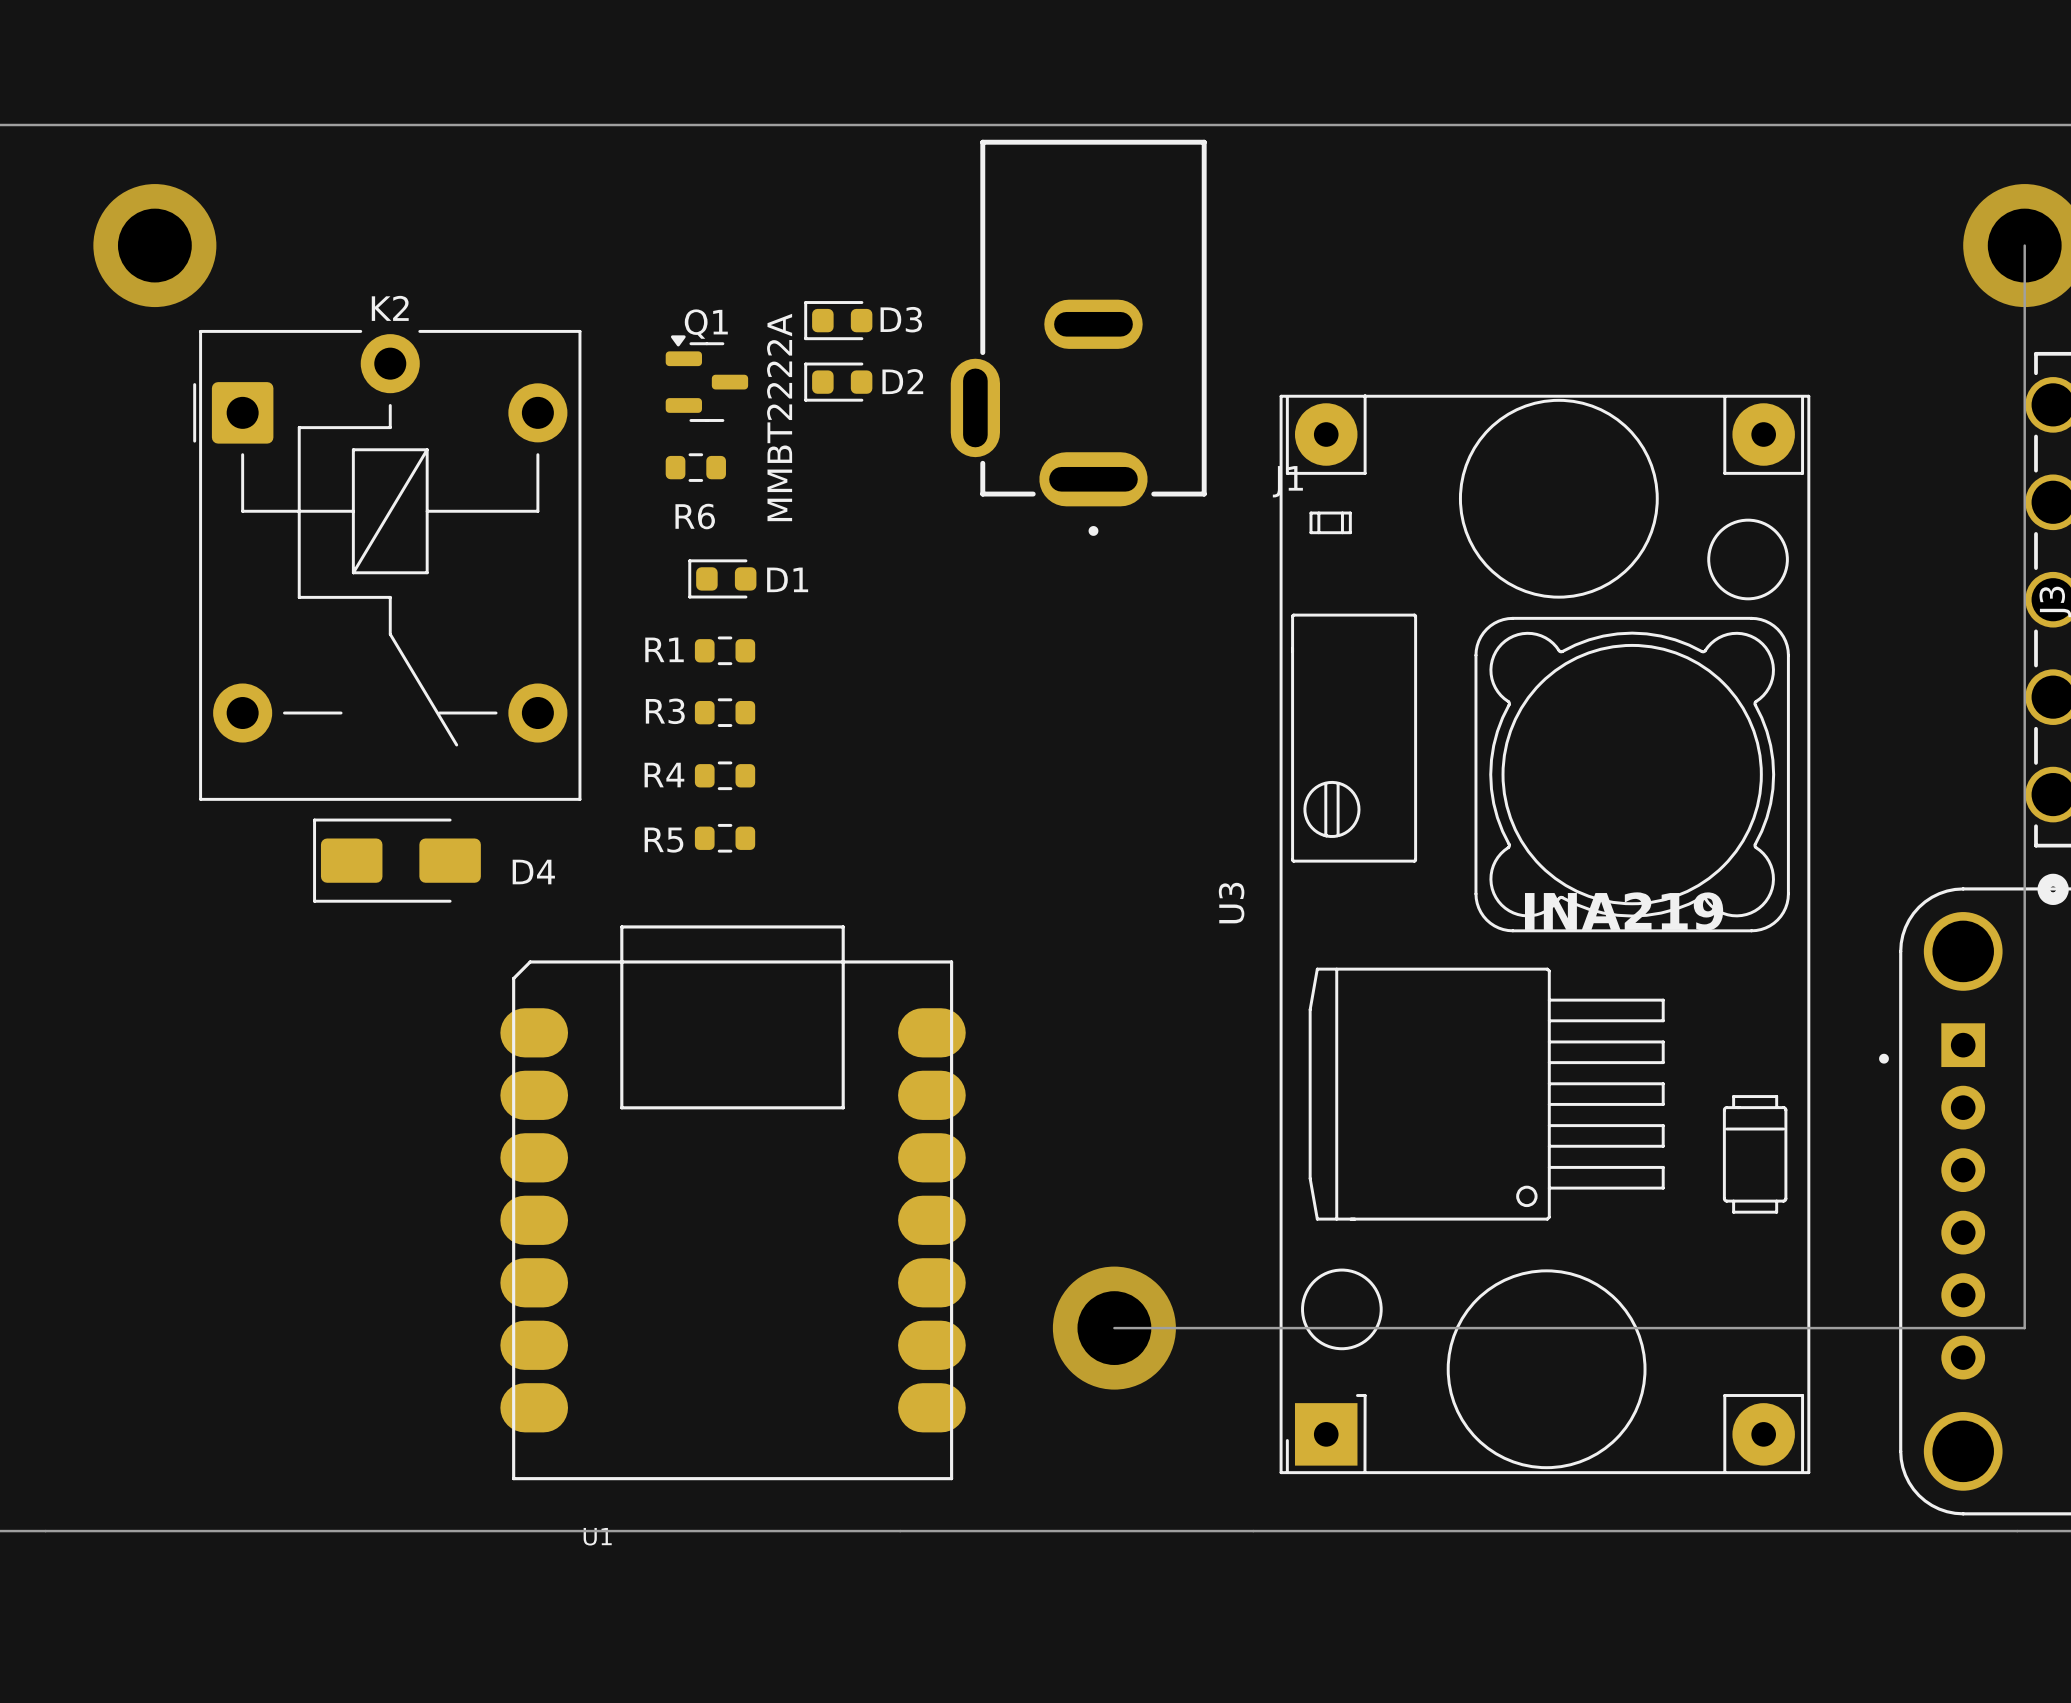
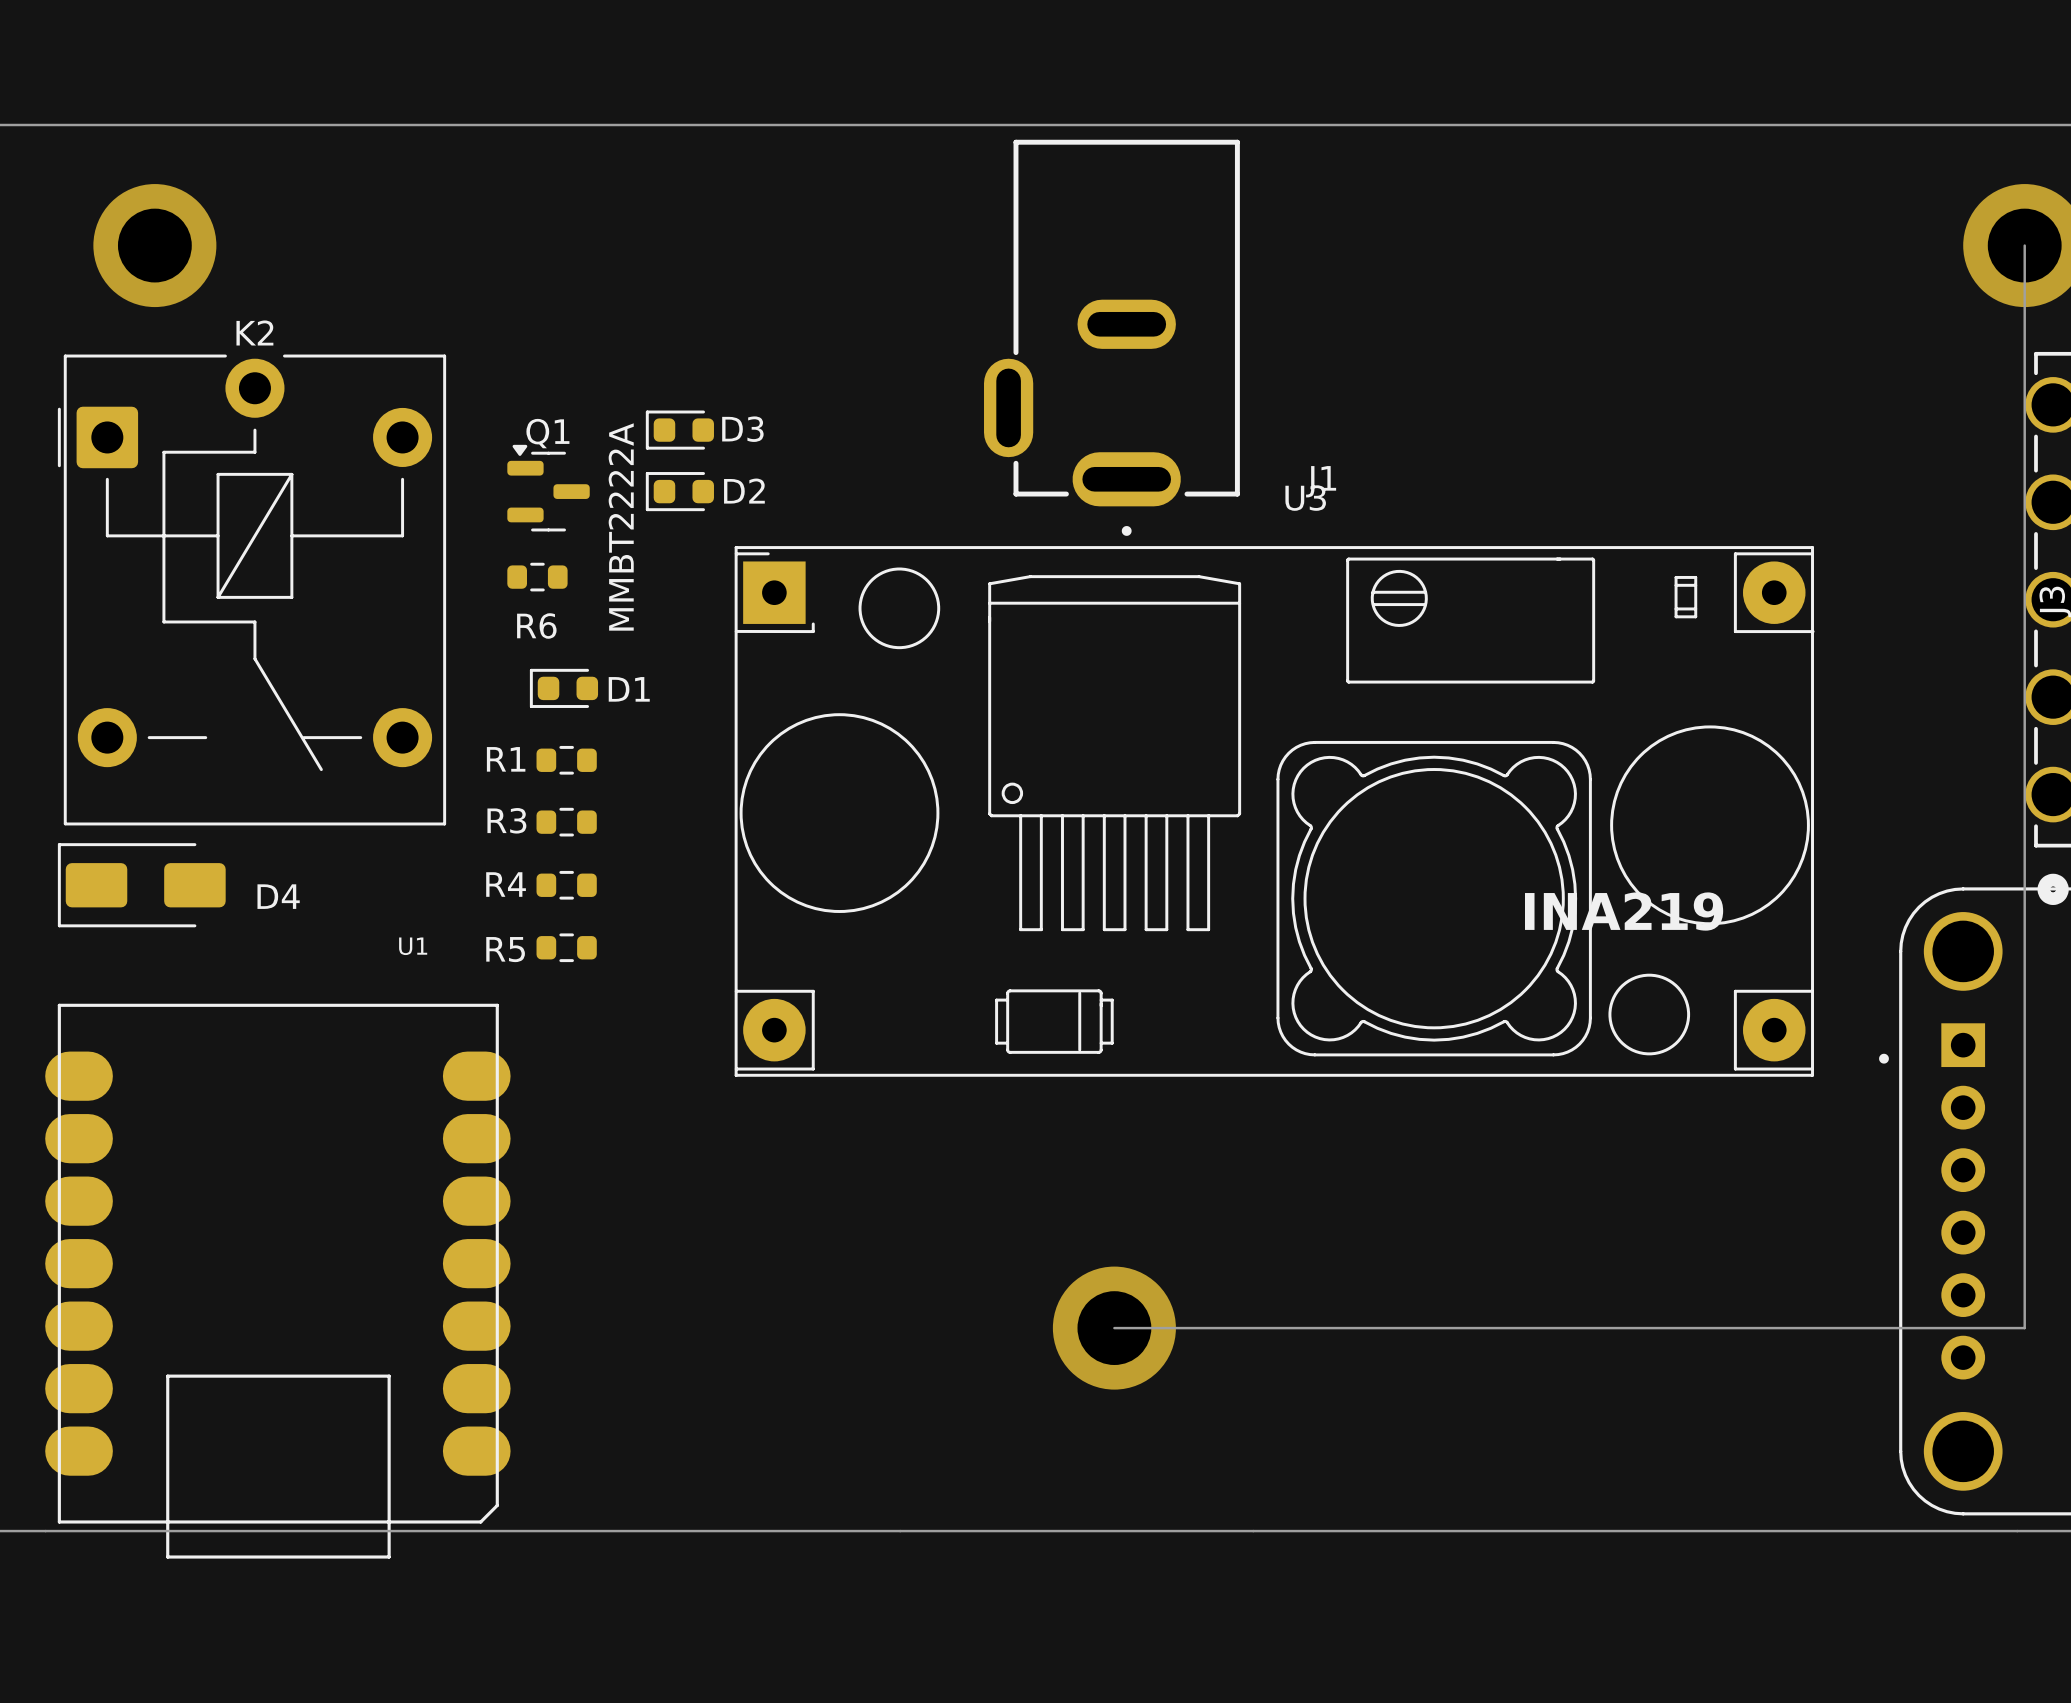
D3 position: (838, 320) -> (679, 430)
J1 position: (1078, 337) -> (1111, 337)
Q1 position: (706, 378) -> (548, 488)
D2 position: (838, 382) -> (679, 491)
R6 position: (695, 467) -> (537, 577)
K2 position: (387, 565) -> (252, 590)
D1 position: (722, 578) -> (563, 688)
R1 position: (725, 650) -> (566, 760)
R3 position: (725, 712) -> (566, 822)
R4 position: (725, 775) -> (566, 885)
R5 position: (725, 838) -> (566, 947)
D4 position: (396, 860) -> (141, 885)
U3 rotation: 0° (1544, 934) -> 90° clockwise (1274, 811)
U1 rotation: 0° (733, 1202) -> 180° (277, 1281)
U1 position: (733, 1202) -> (277, 1281)

